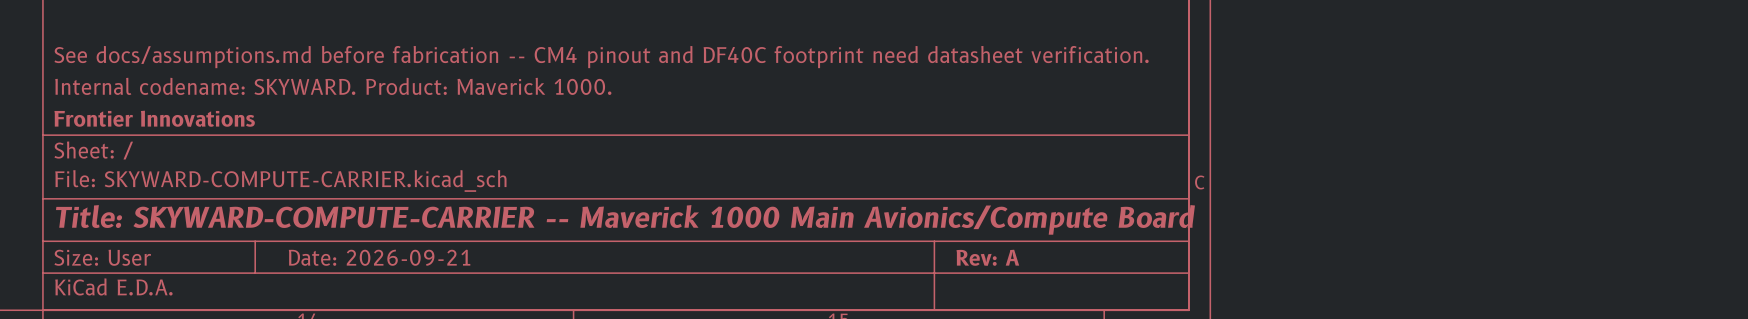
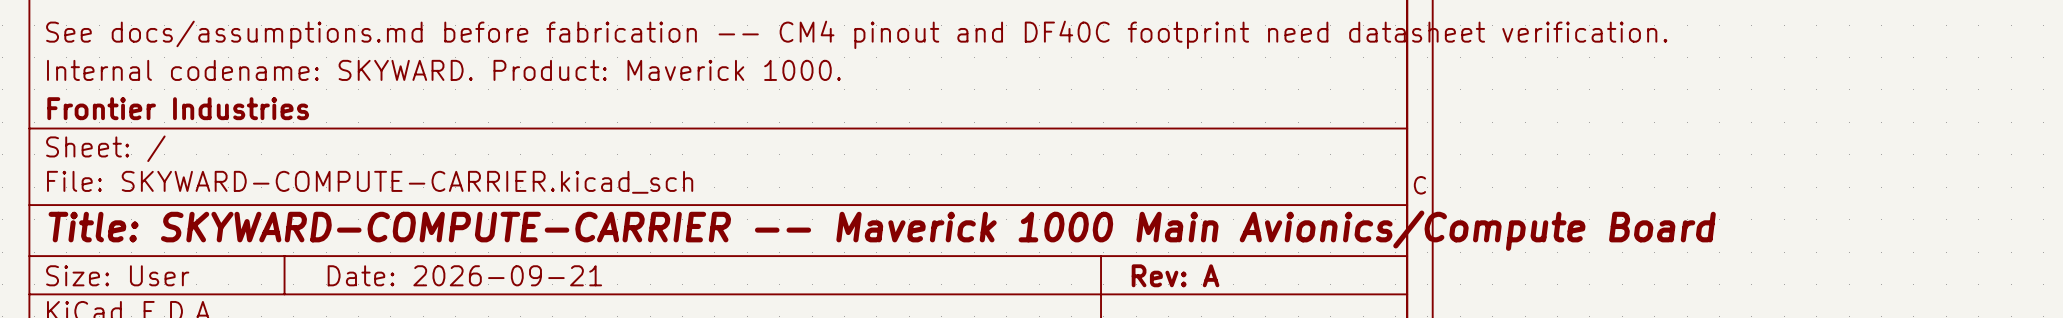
title block: Frontier Innovations (154, 118) -> Frontier Industries (178, 108)

